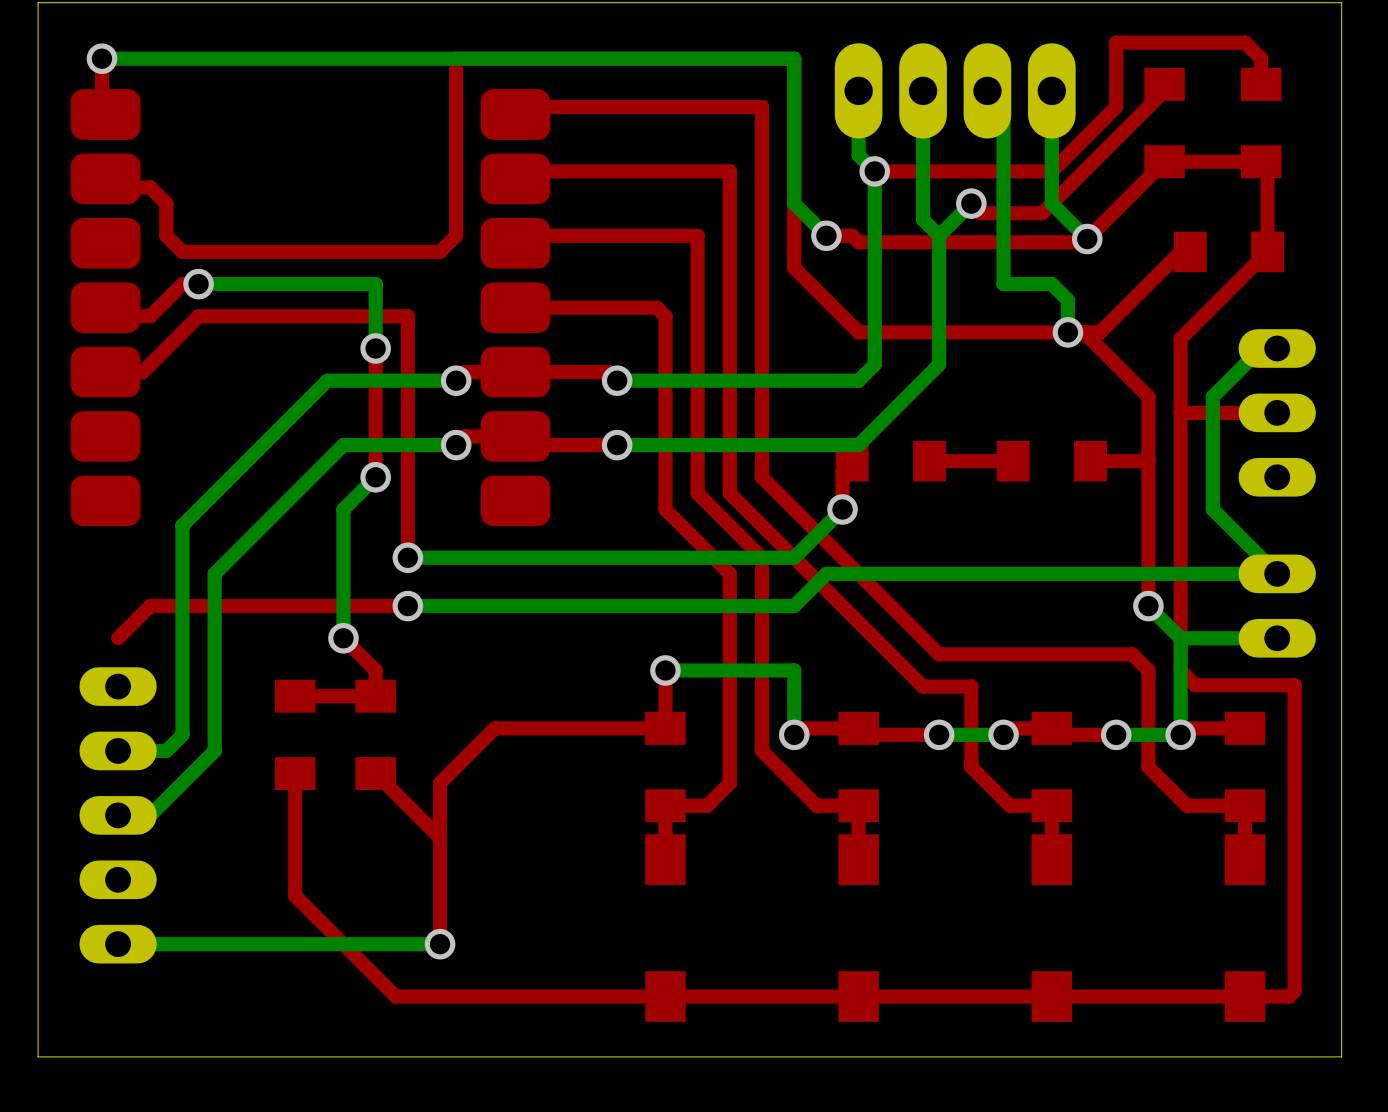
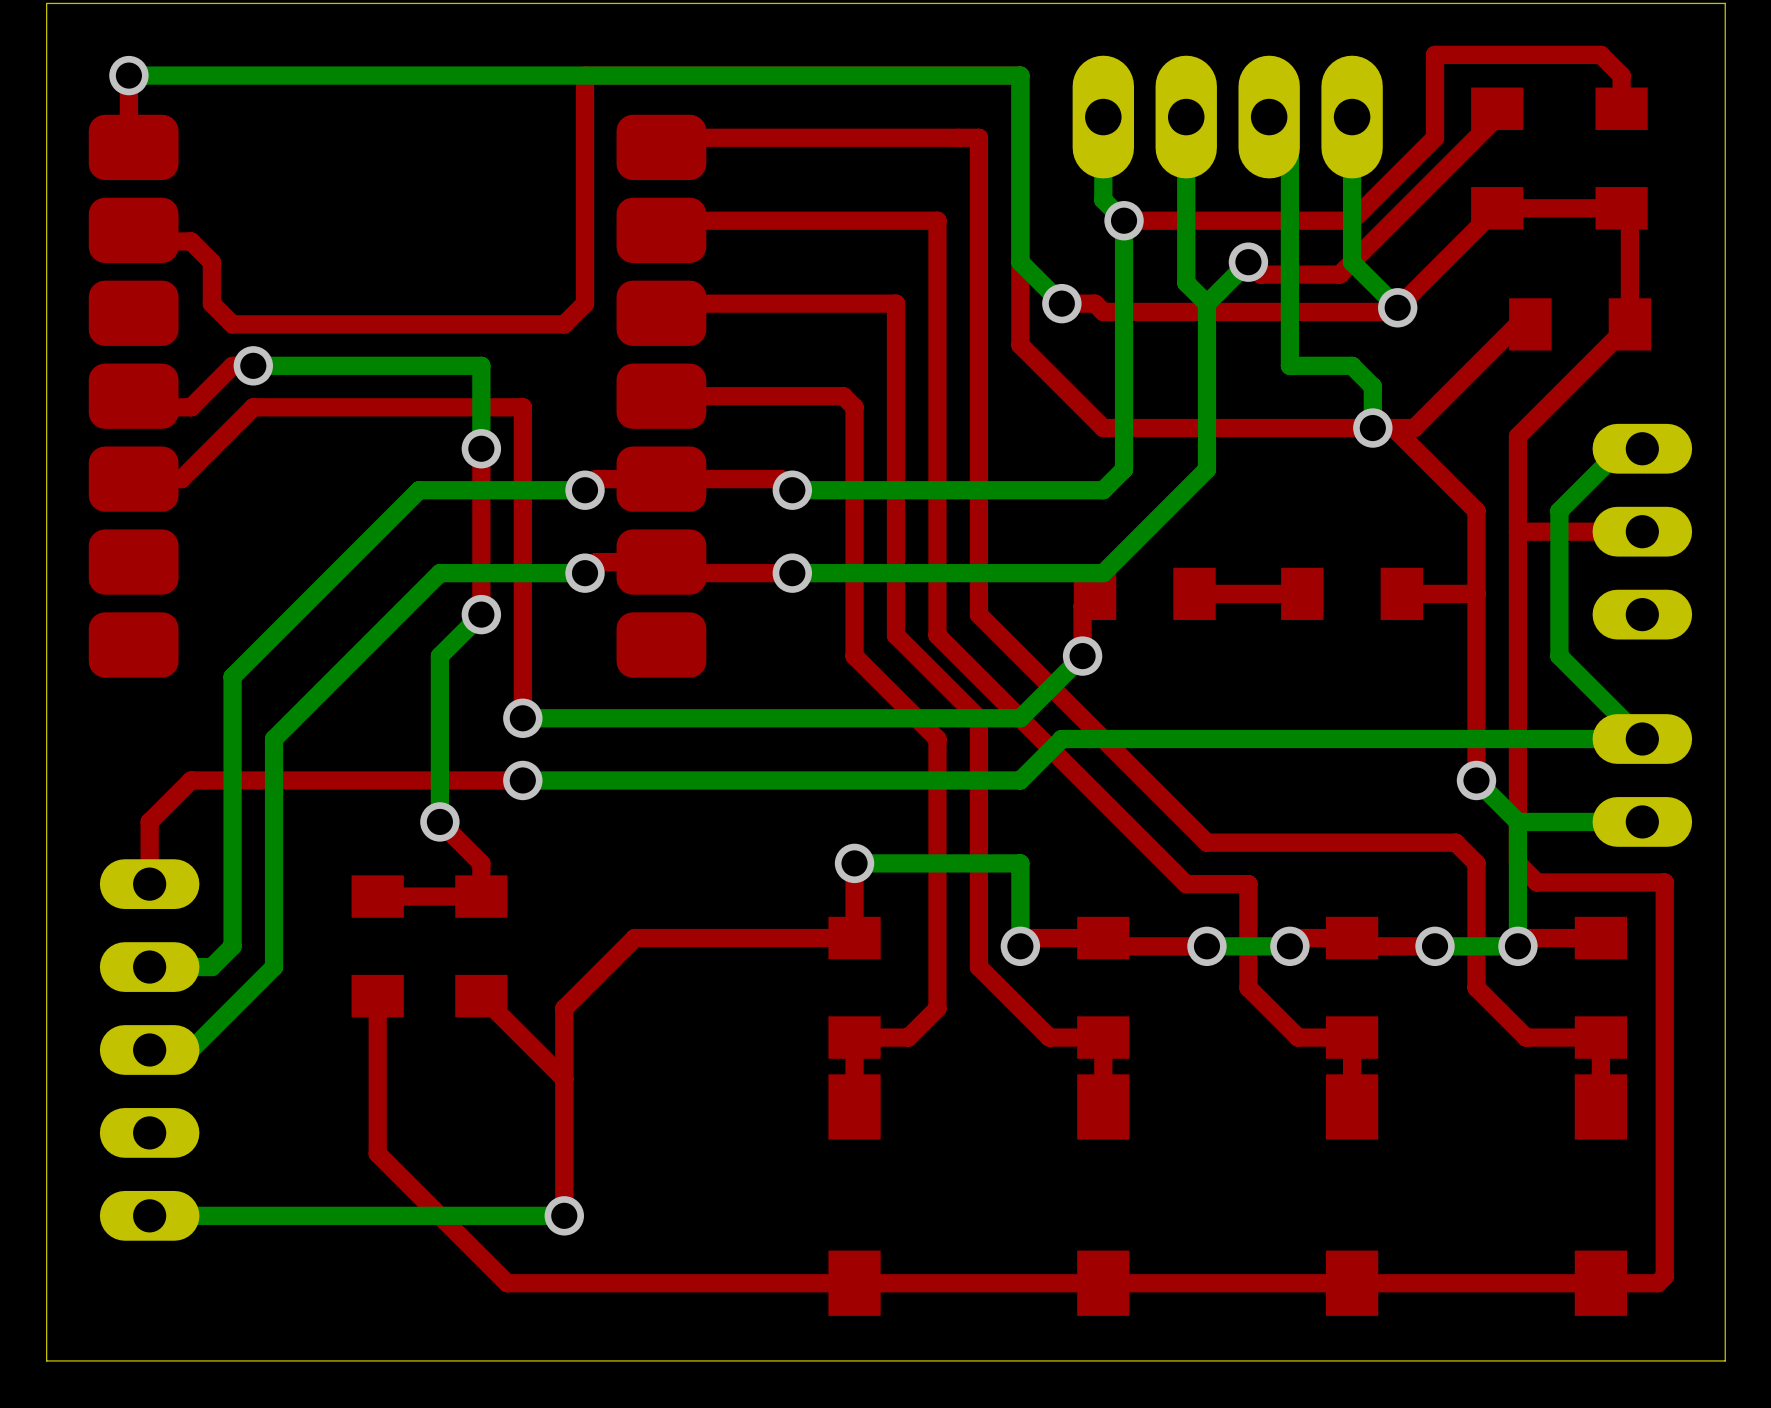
top track: none -> (149, 821) (149, 884)

